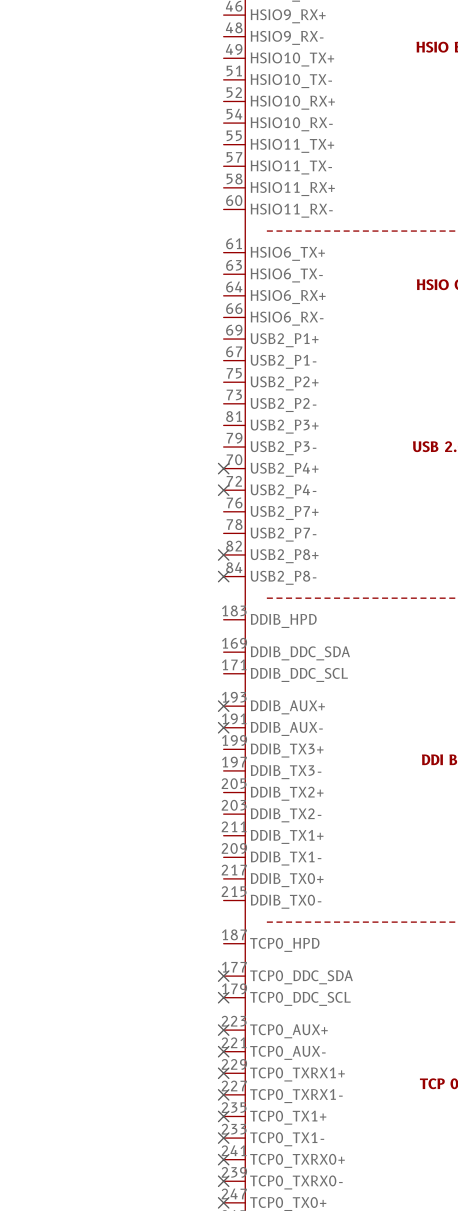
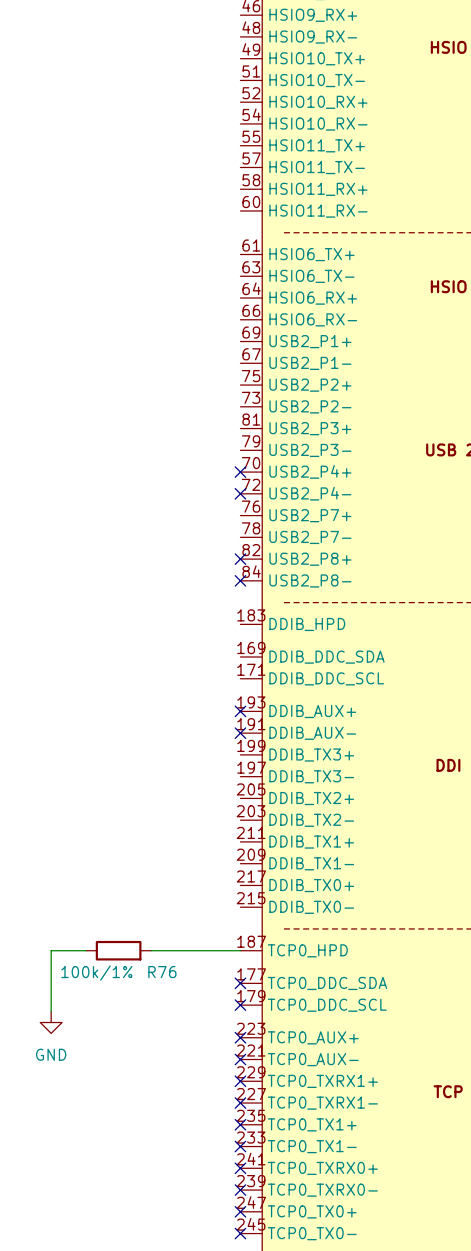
wire: none -> (85, 950) (51, 950) (51, 1011)
R76: none -> 100k/1% (118, 950)
wire: none -> (151, 950) (240, 950)
power symbol: none -> GND (51, 1022)

